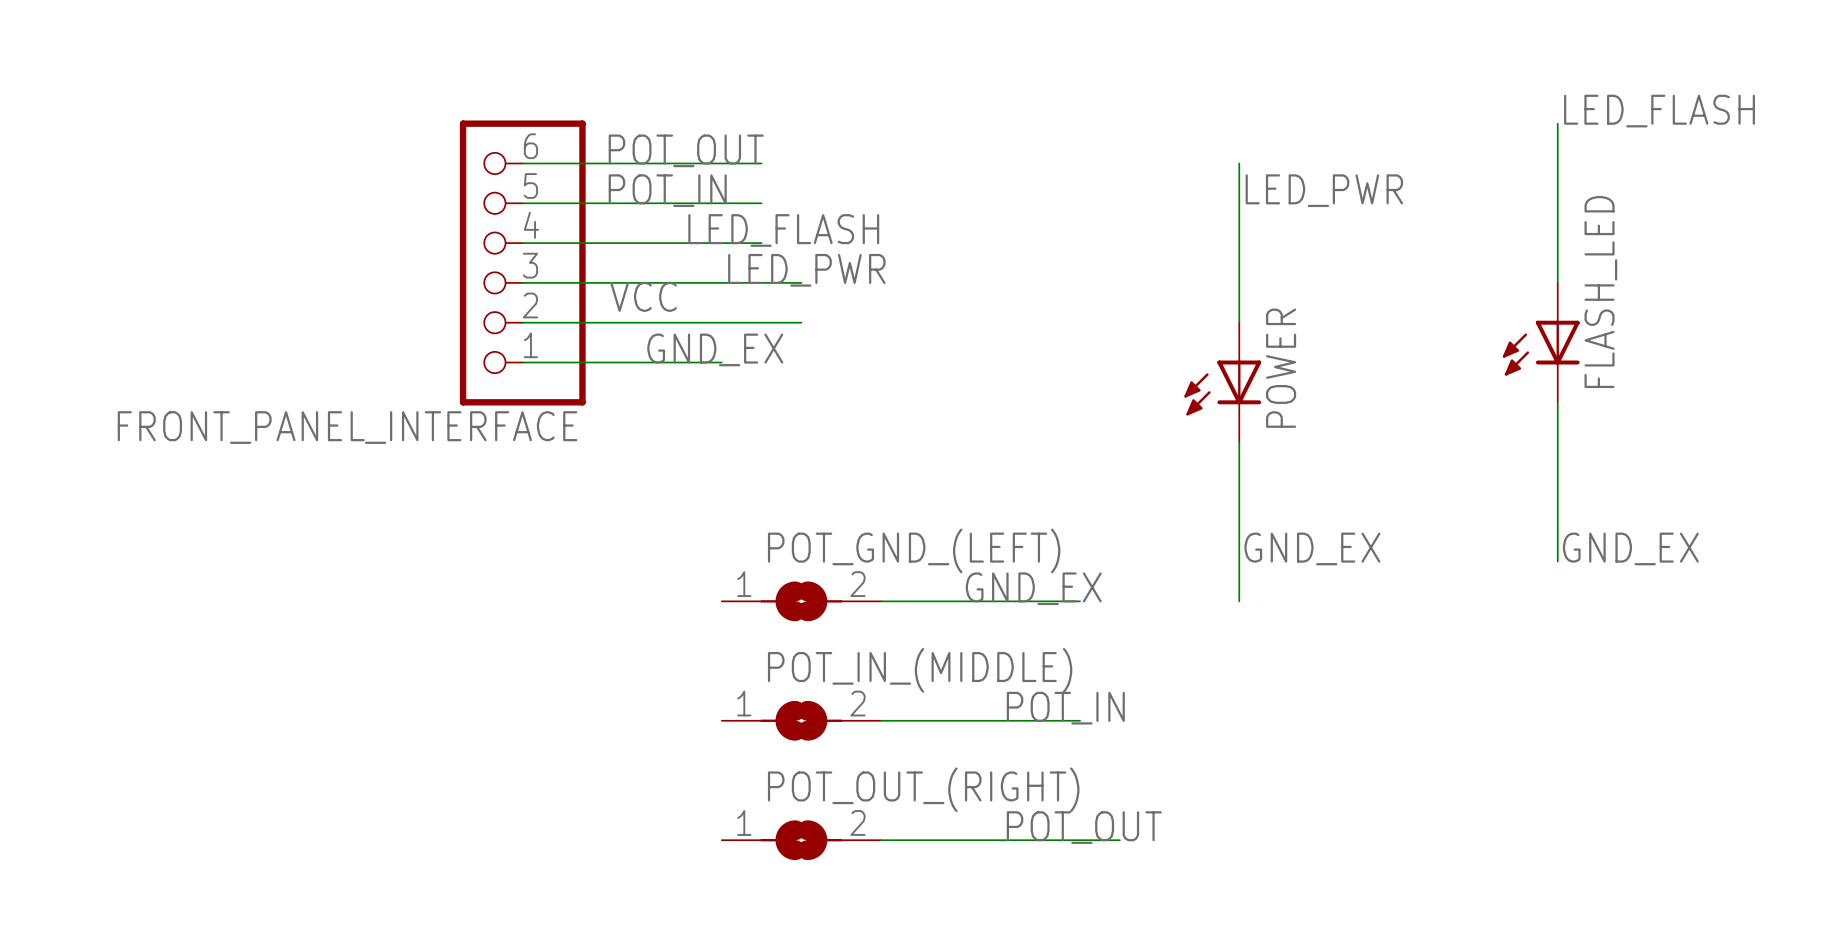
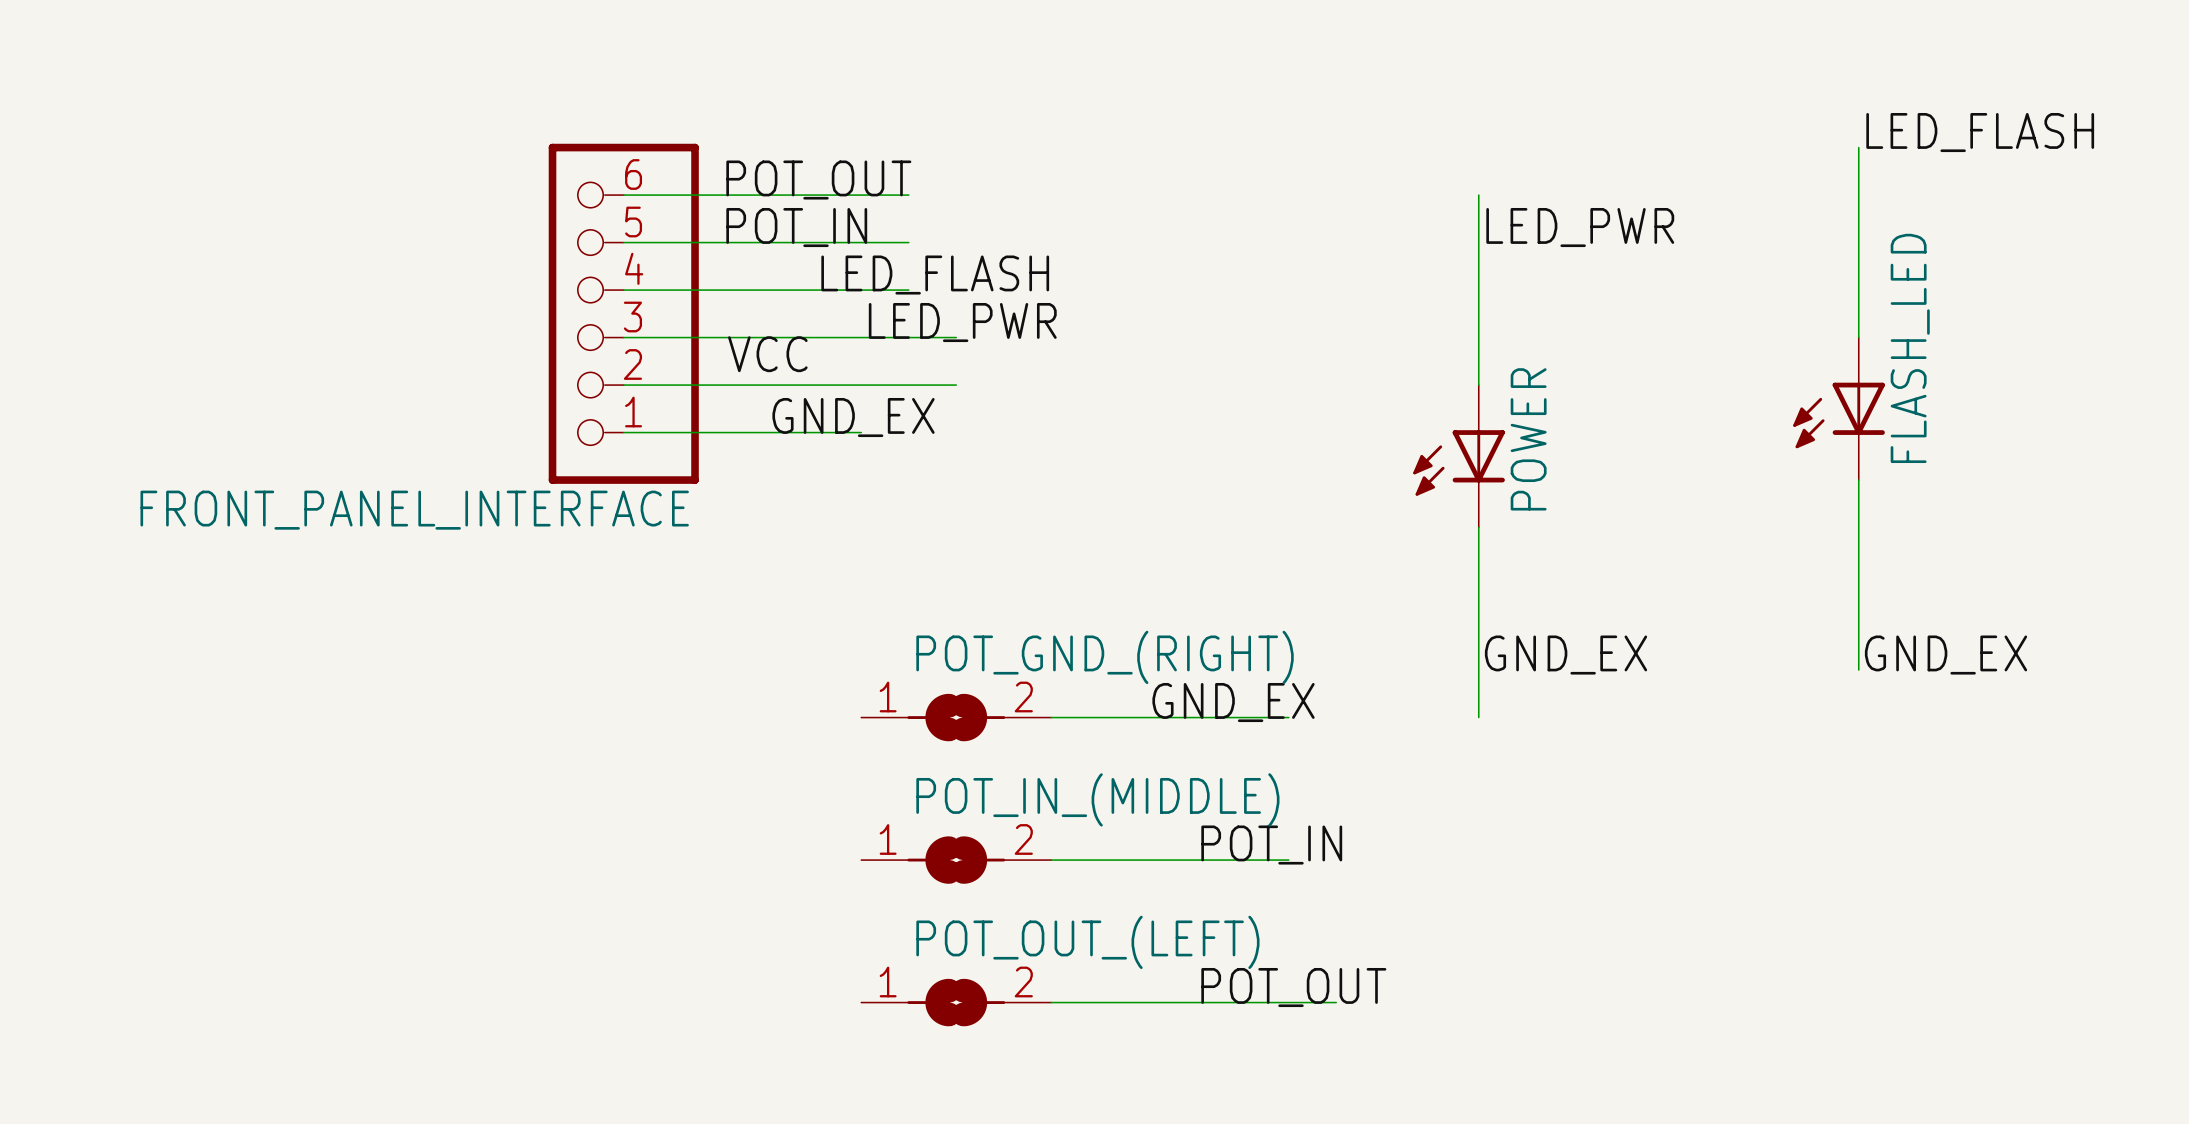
POT_GND_(LEFT) name: POT_GND_(LEFT) (914, 550) -> POT_GND_(RIGHT) (1105, 657)
POT_OUT_(RIGHT) name: POT_OUT_(RIGHT) (923, 789) -> POT_OUT_(LEFT) (1087, 942)

